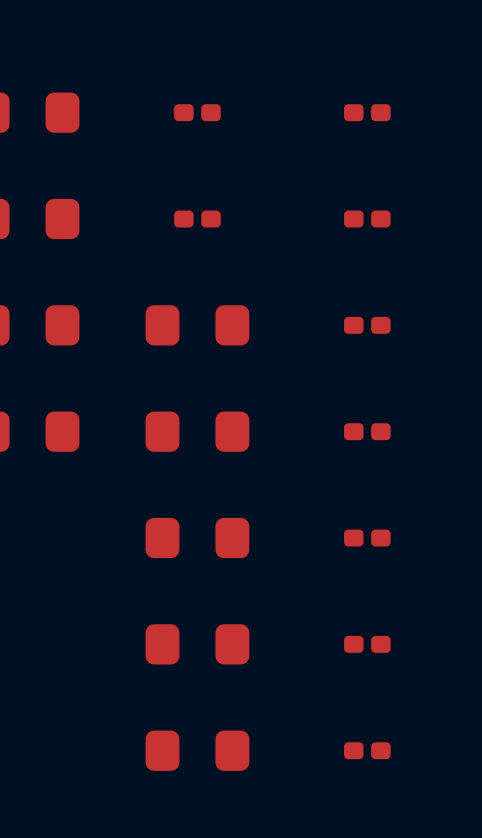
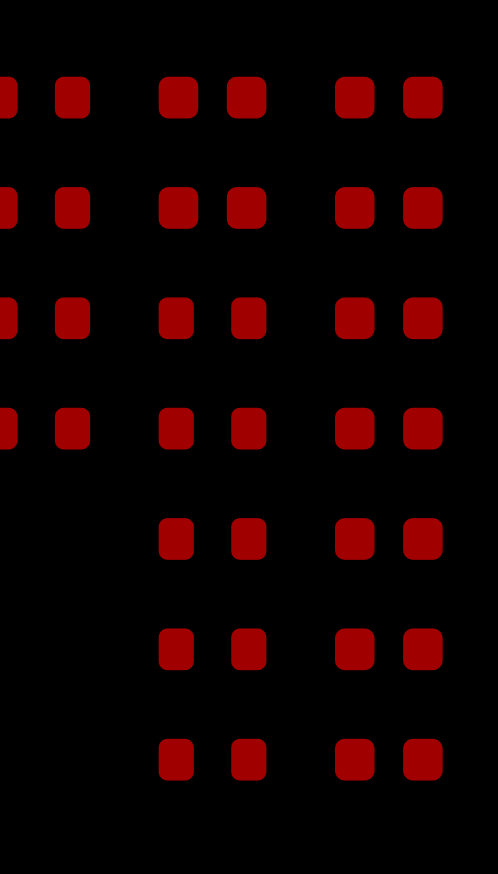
part footprint: [174, 104, 221, 122] -> [158, 76, 267, 119]
part footprint: [344, 104, 391, 122] -> [334, 76, 443, 119]
part footprint: [174, 210, 221, 228] -> [158, 187, 267, 229]
part footprint: [344, 210, 391, 228] -> [334, 187, 443, 229]
part footprint: [344, 316, 391, 334] -> [334, 297, 443, 340]
part footprint: [344, 423, 391, 441] -> [334, 407, 443, 450]
part footprint: [344, 529, 391, 547] -> [334, 518, 443, 560]
part footprint: [344, 635, 391, 653] -> [334, 628, 443, 671]
part footprint: [344, 742, 391, 760] -> [334, 738, 443, 781]

